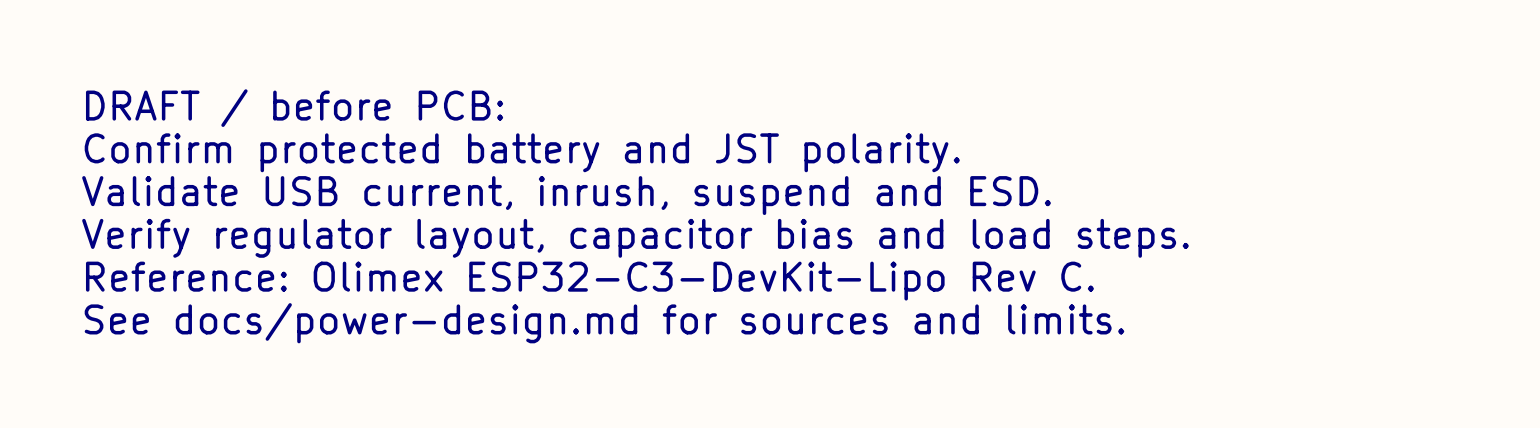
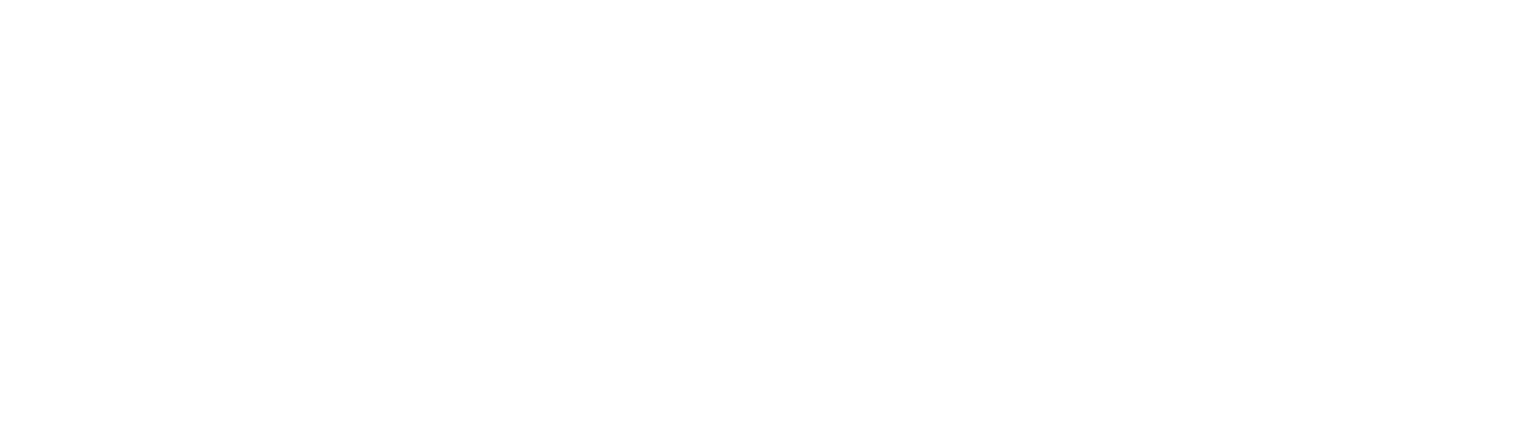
text: DRAFT / before PCB: (294, 108) -> none
text: Confirm protected battery and JST polarity. (522, 152) -> none
text: Validate USB current, inrush, suspend and ESD. (566, 195) -> none
text: Verify regulator layout, capacitor bias and load steps. (635, 238) -> none
text: Reference: Olimex ESP32-C3-DevKit-Lipo Rev C. (589, 281) -> none
text: See docs/power-design.md for sources and limits. (604, 323) -> none

